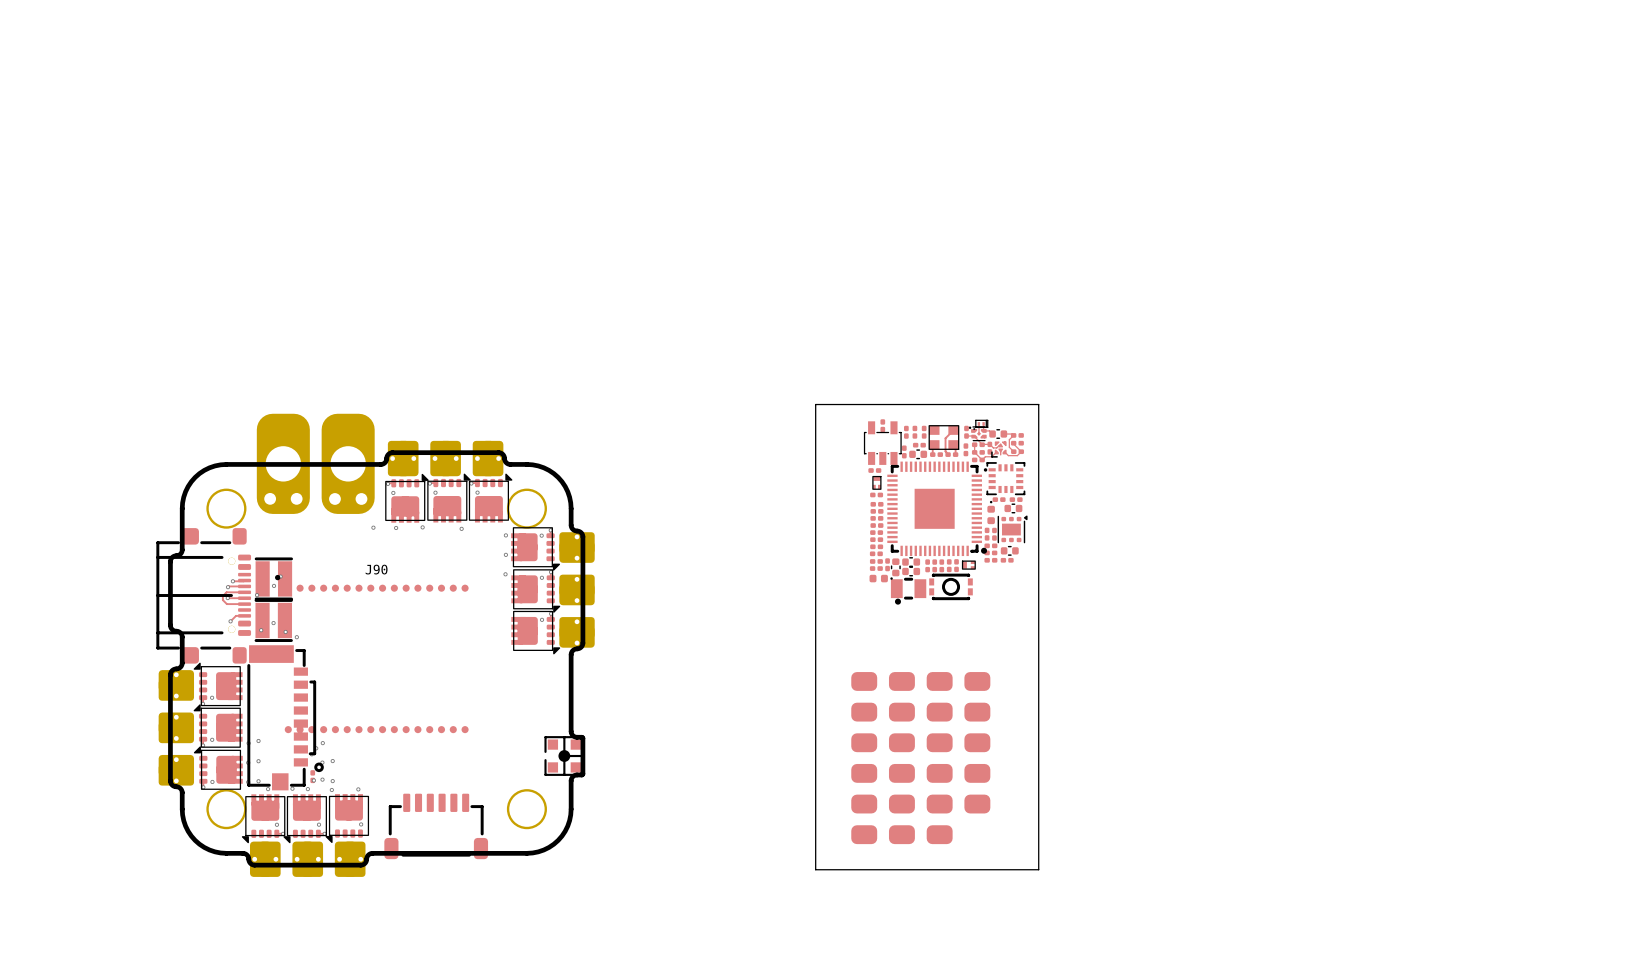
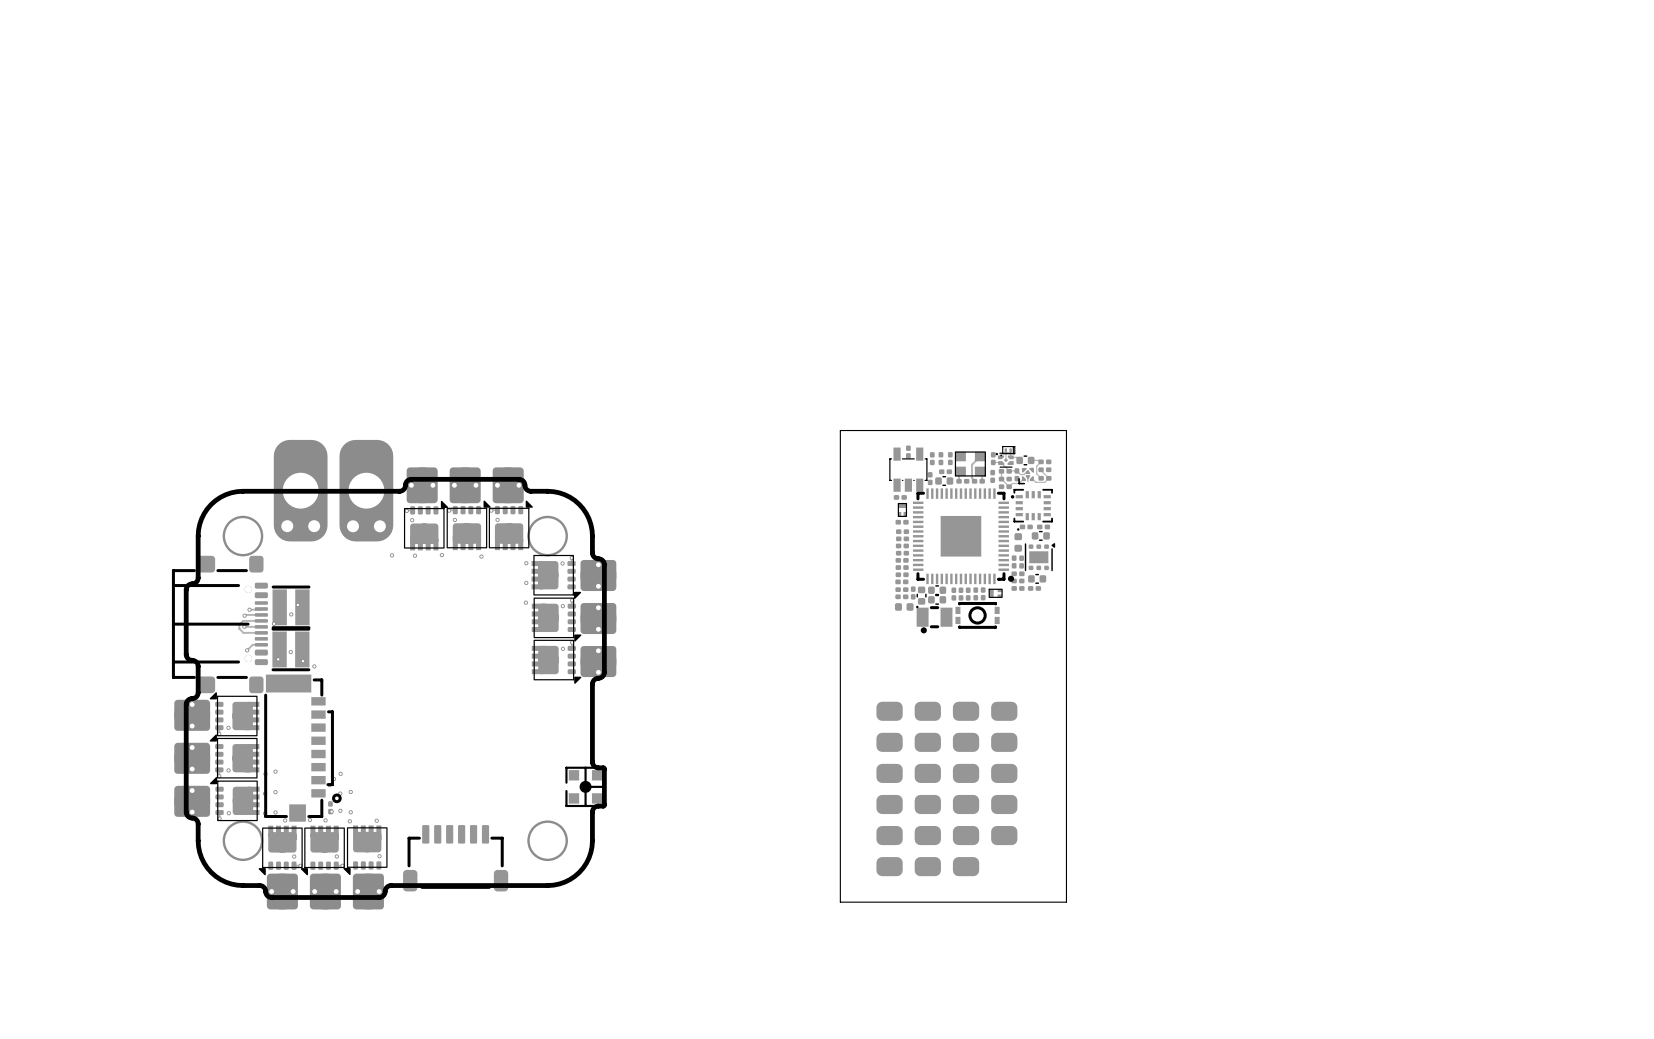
J90: (371, 654) -> none

